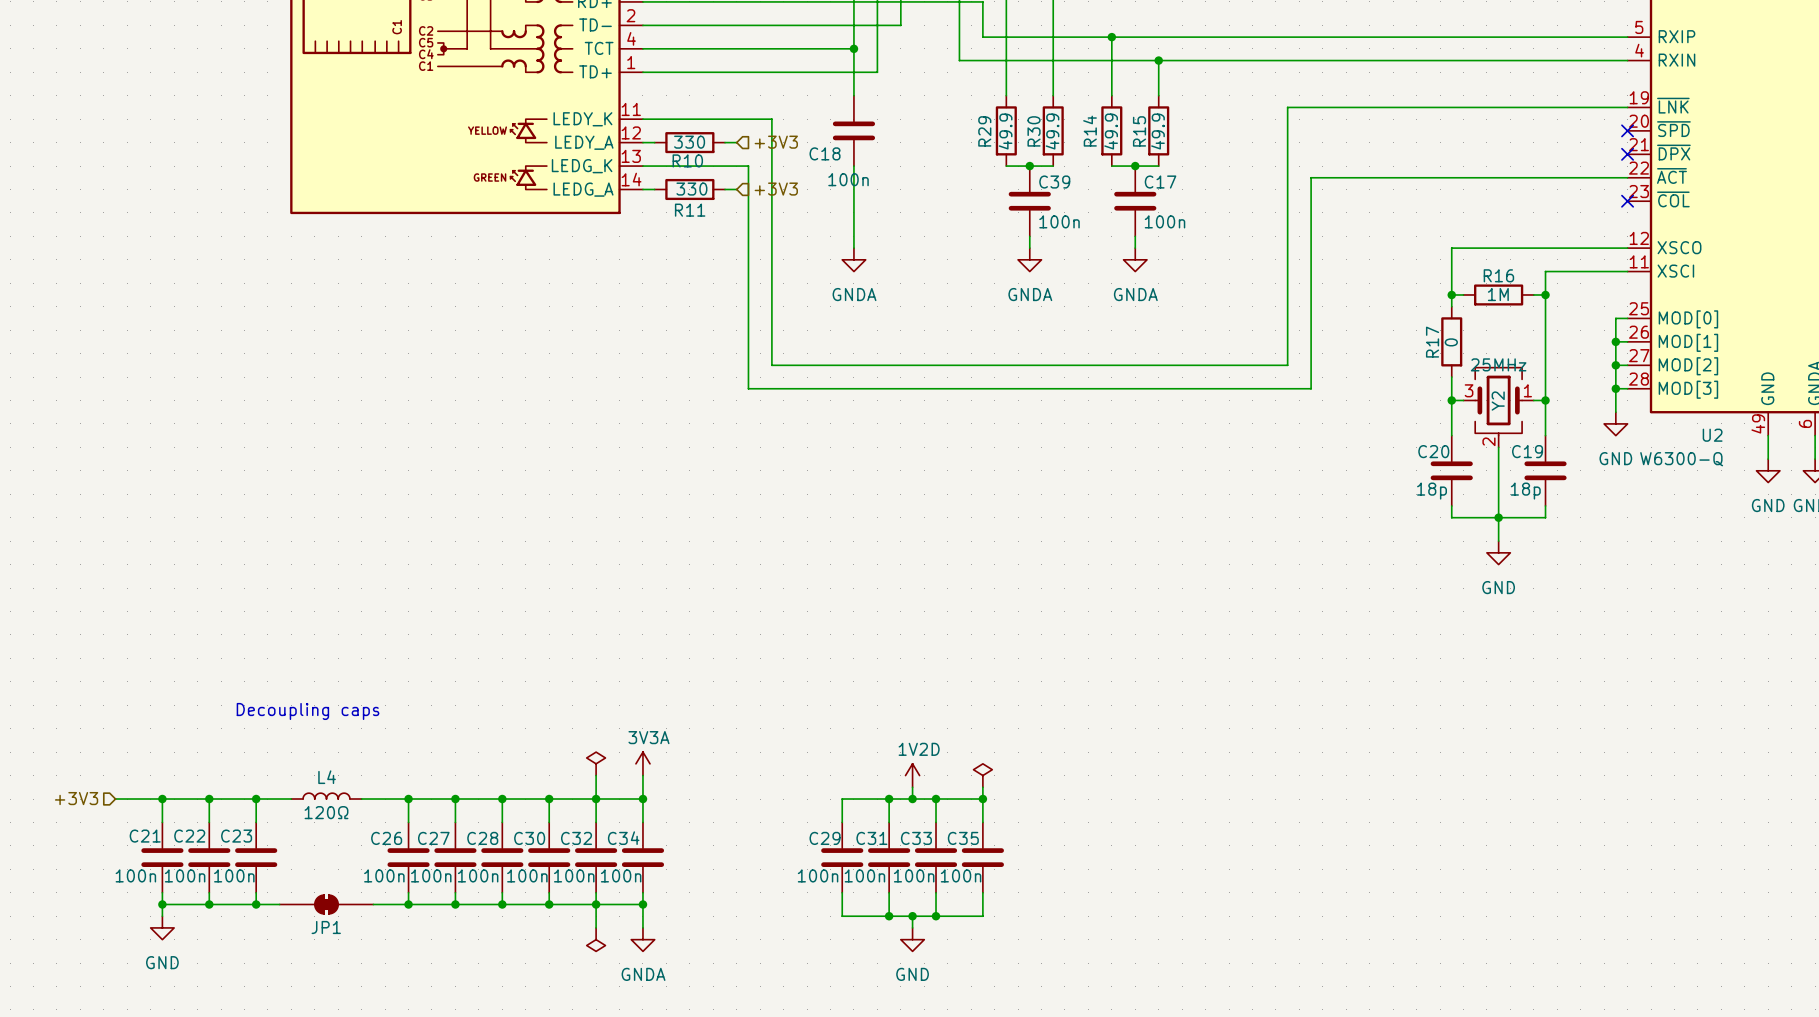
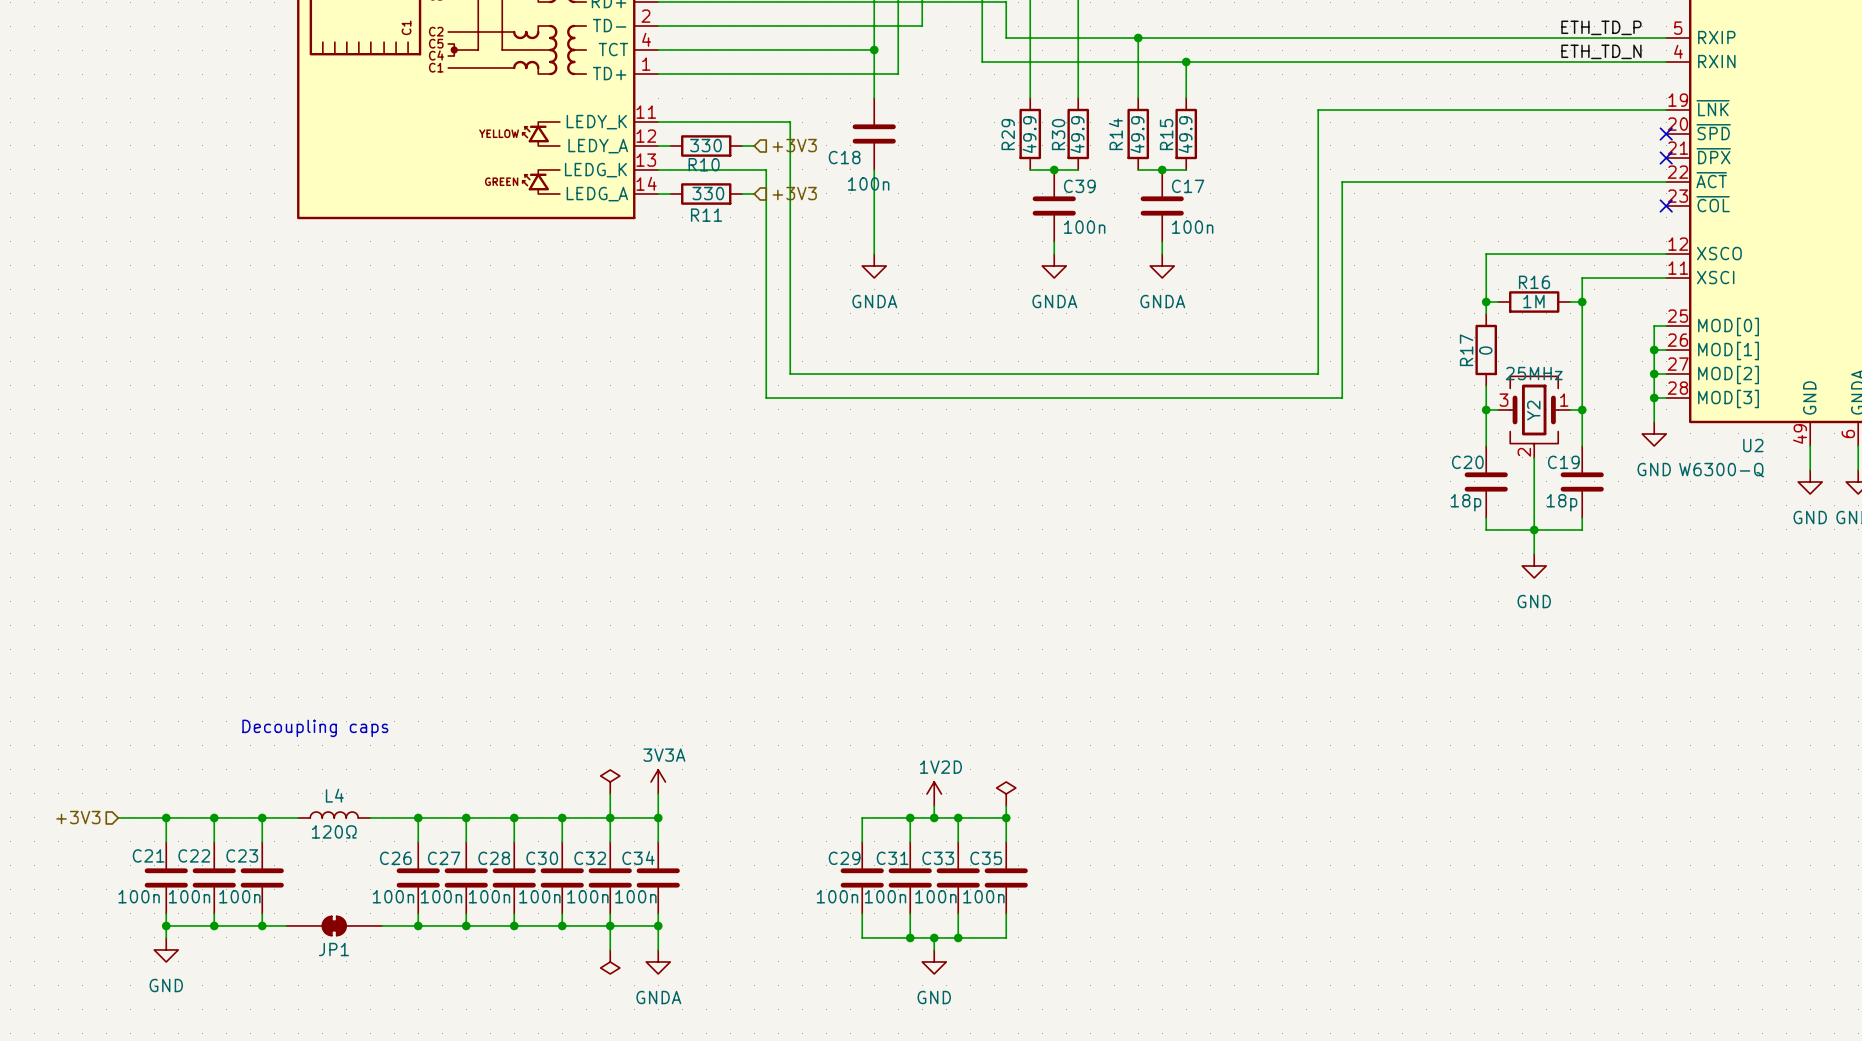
label: none -> ETH_TD_P (1601, 27)
label: none -> ETH_TD_N (1601, 51)

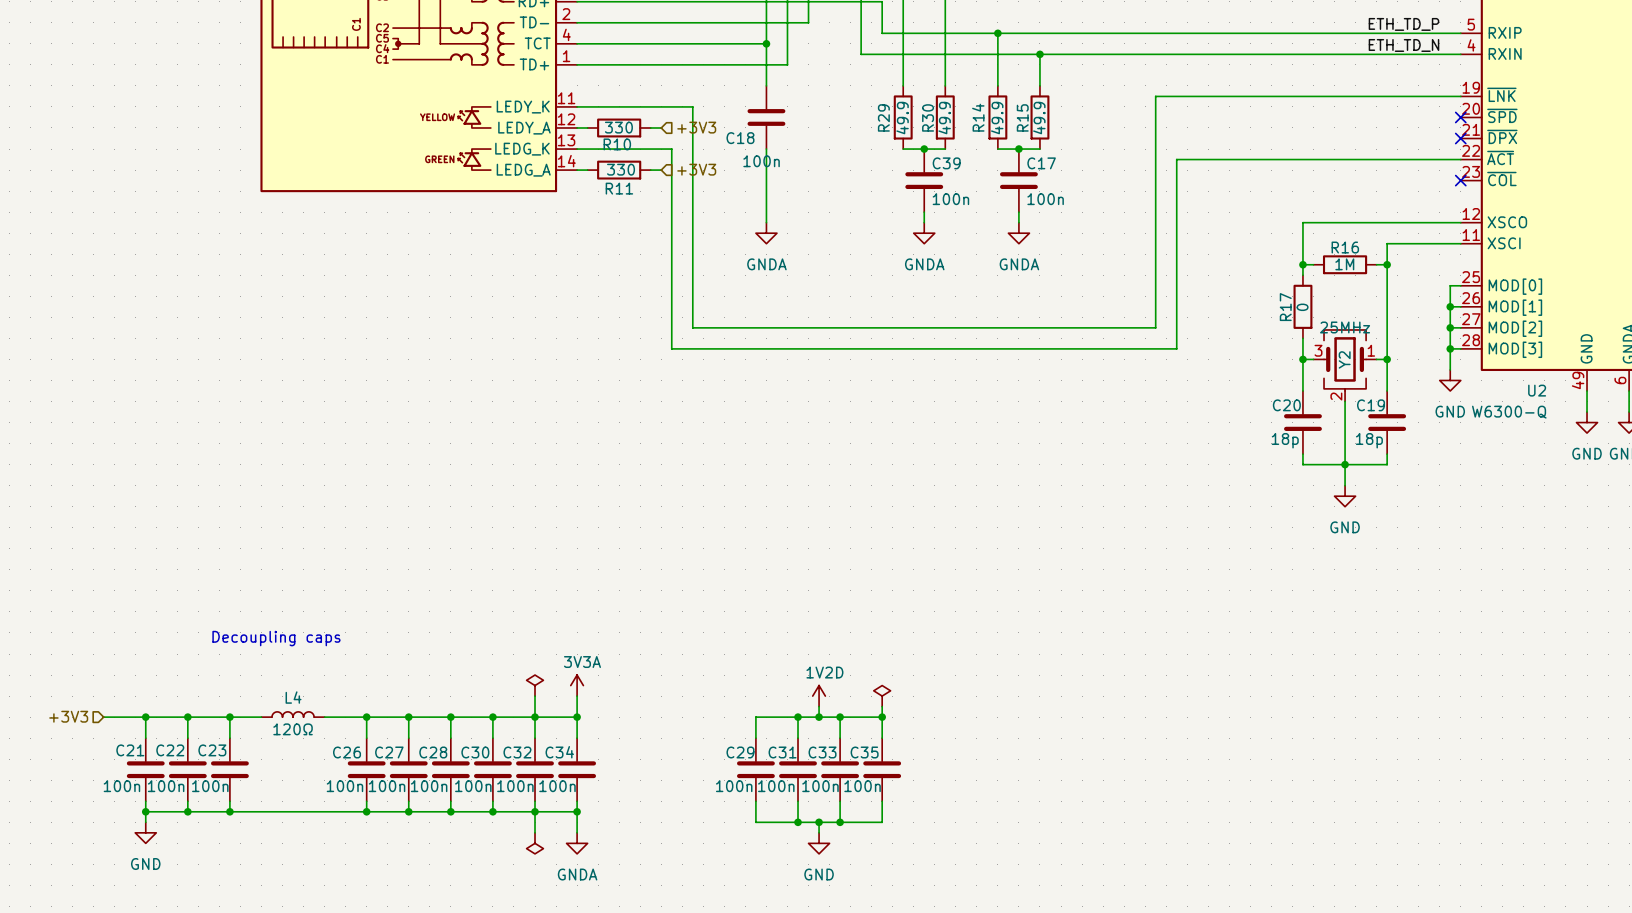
JP1: (334, 925) -> none

